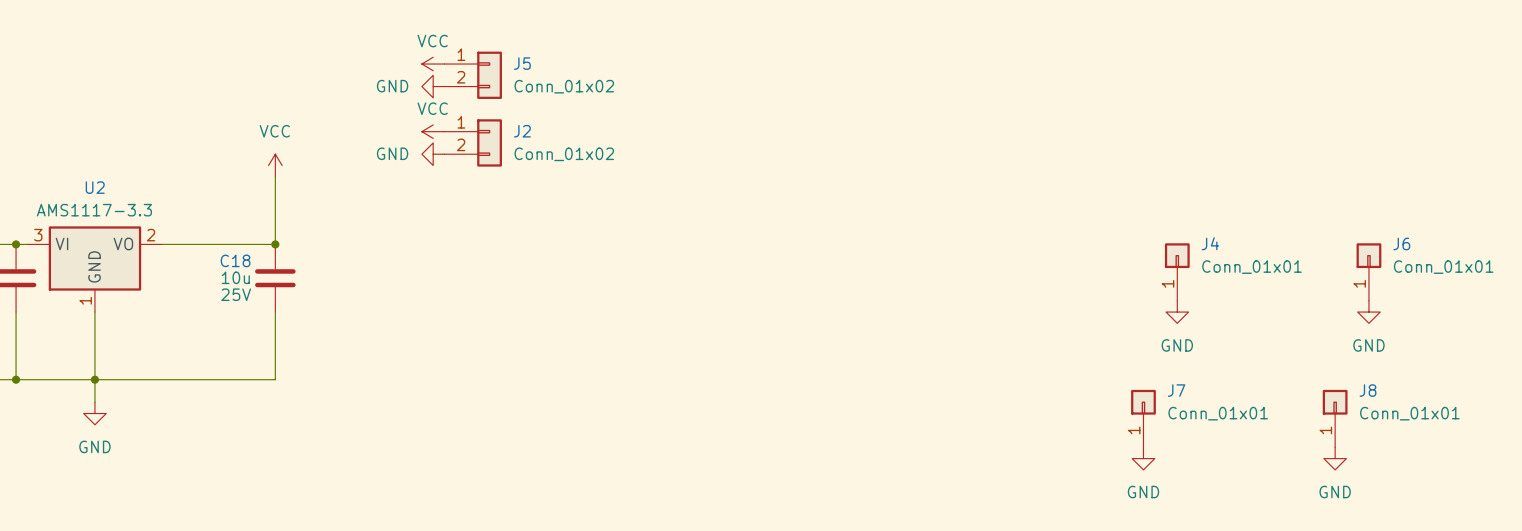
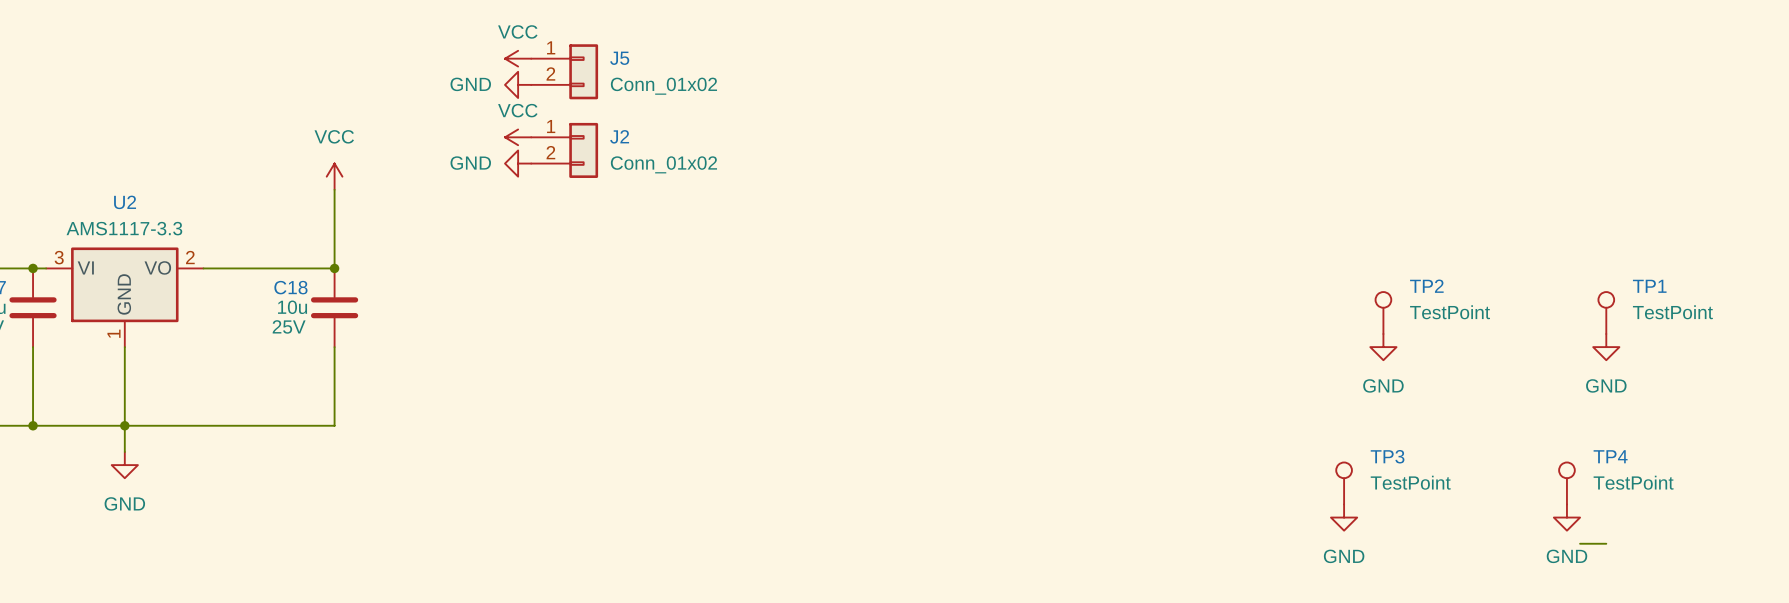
J4: Conn_01x01 (1177, 272) -> none
J6: Conn_01x01 (1368, 272) -> none
TP2: none -> TestPoint (1383, 313)
TP1: none -> TestPoint (1606, 313)
J7: Conn_01x01 (1143, 418) -> none
J8: Conn_01x01 (1335, 418) -> none
TP3: none -> TestPoint (1344, 483)
TP4: none -> TestPoint (1566, 483)
wire: none -> (1580, 543) (1606, 543)

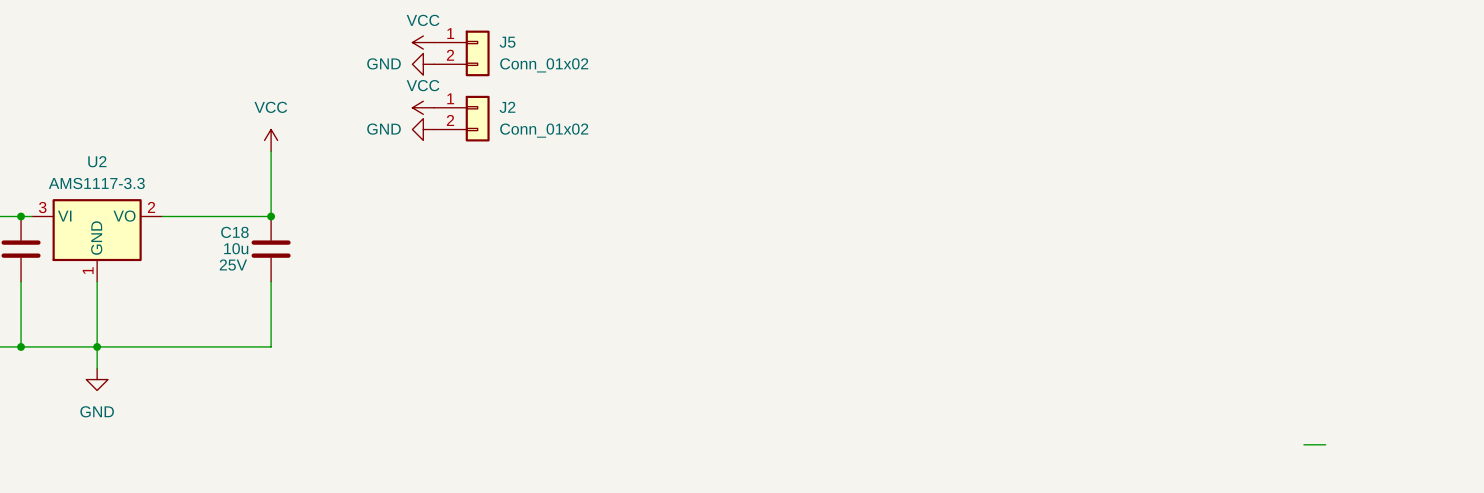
TP2: TestPoint (1383, 313) -> none
TP1: TestPoint (1606, 313) -> none
power symbol: GND (1383, 347) -> none
power symbol: GND (1606, 347) -> none
TP3: TestPoint (1344, 483) -> none
TP4: TestPoint (1566, 483) -> none
power symbol: GND (1344, 517) -> none
power symbol: GND (1566, 517) -> none

